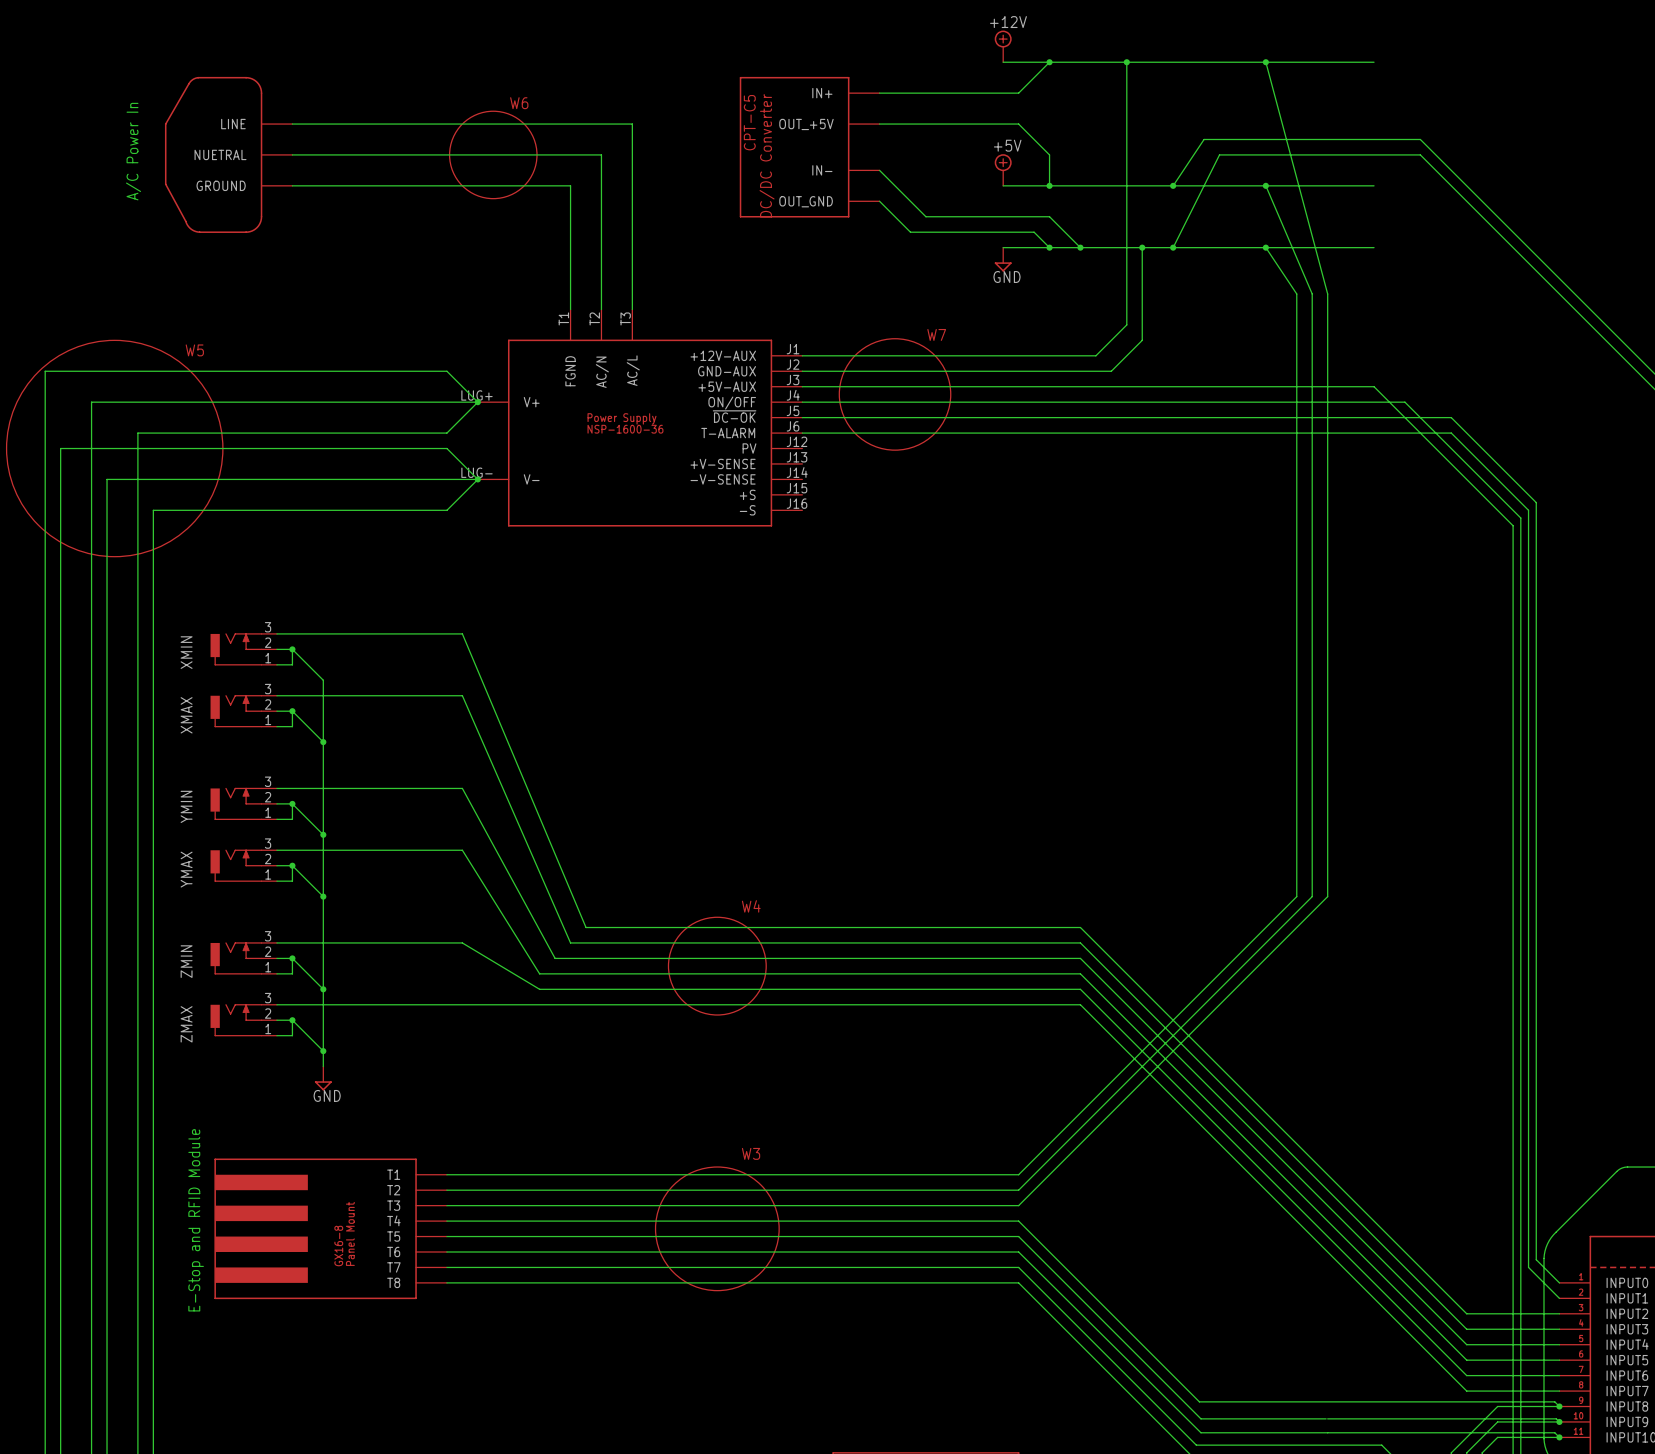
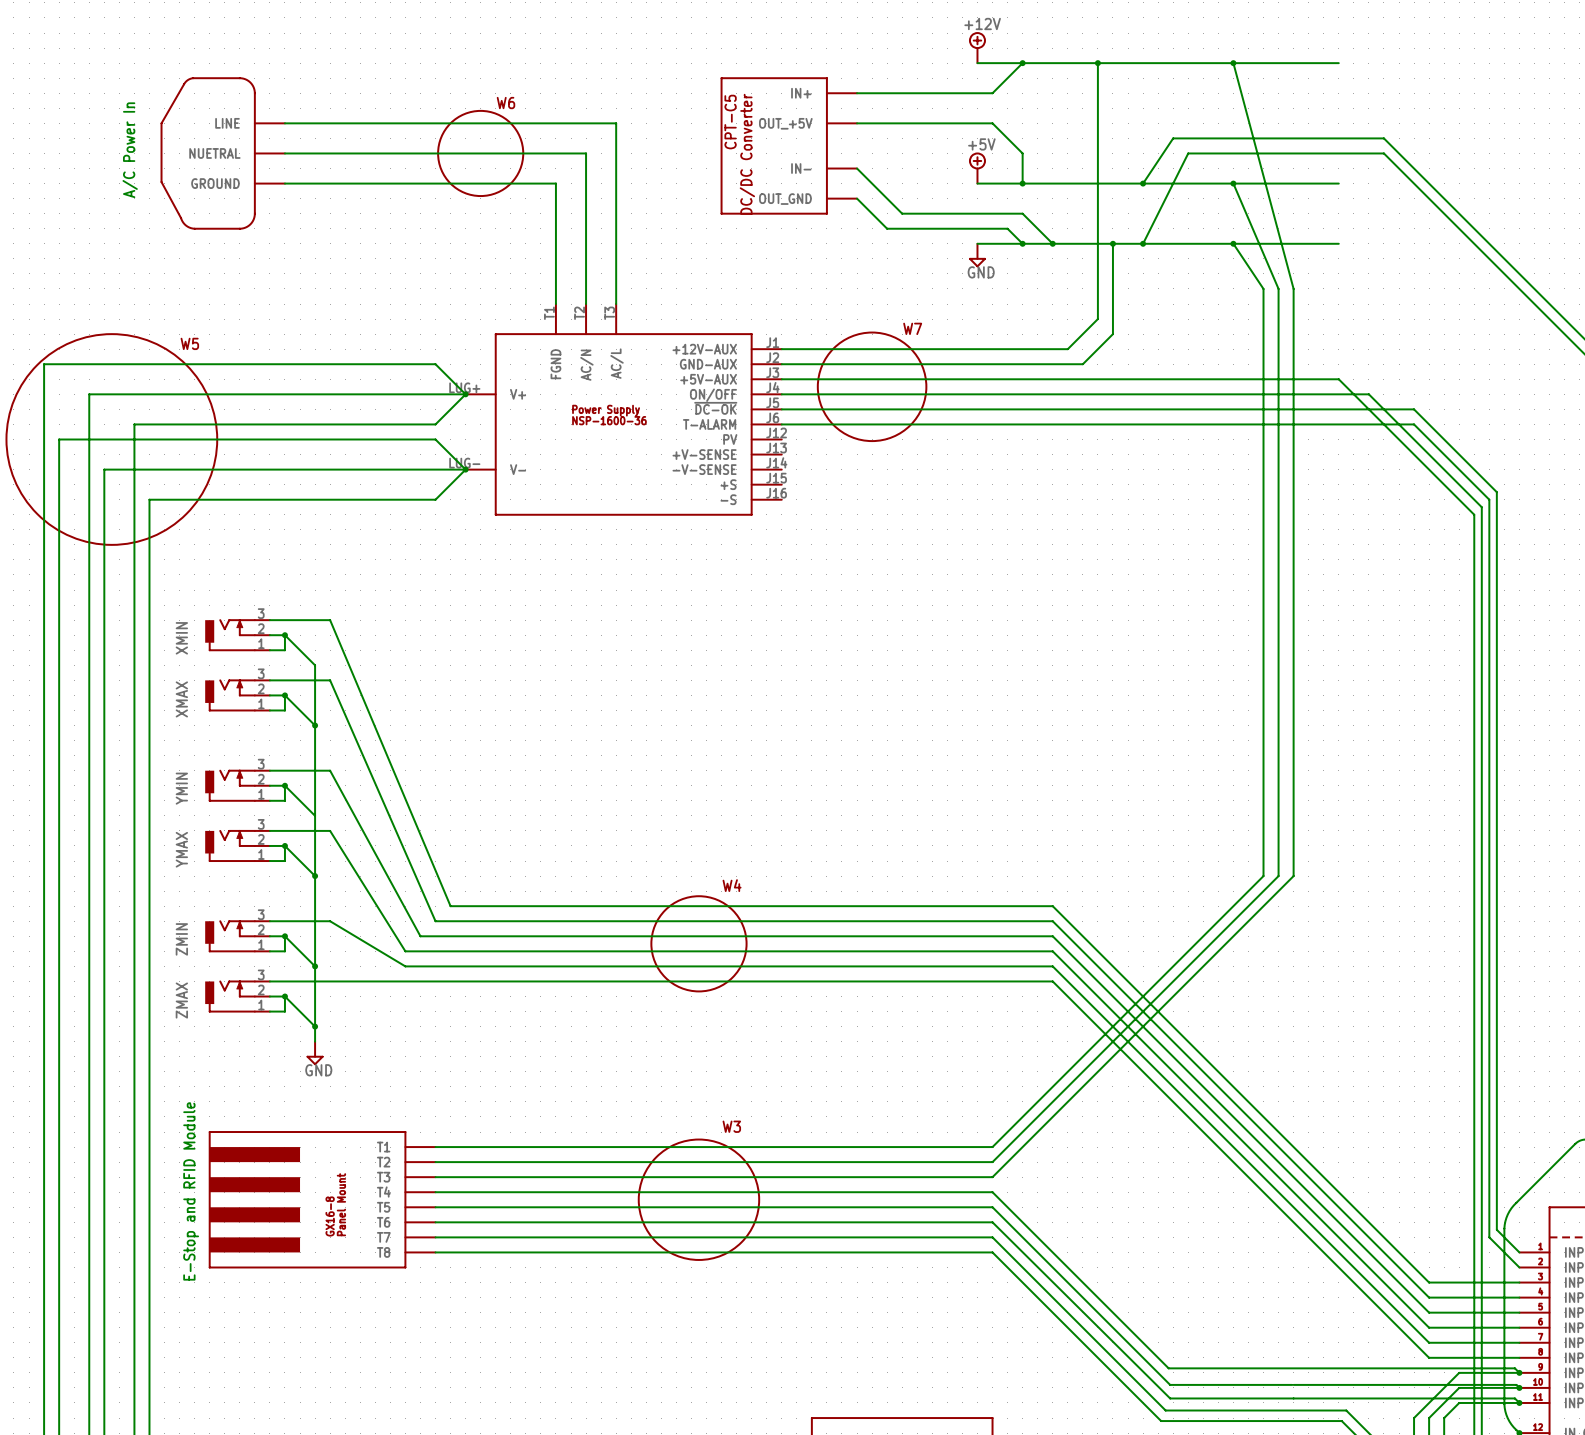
wire: (338, 633) (462, 633) (586, 927) -> (330, 620) (450, 906) (571, 906)
wire: (338, 695) (462, 695) (570, 942) -> (330, 680) (435, 921)
wire: (338, 788) (462, 788) (555, 958) -> (330, 770) (420, 936) (540, 936)
junction: (323, 834) -> none
wire: (338, 850) (462, 850) (539, 973) -> (330, 830) (405, 951) (525, 951)
wire: (338, 942) (446, 942) -> (330, 921) (405, 966) (525, 966)
wire: (462, 942) (539, 989) -> (450, 921) (555, 921)

